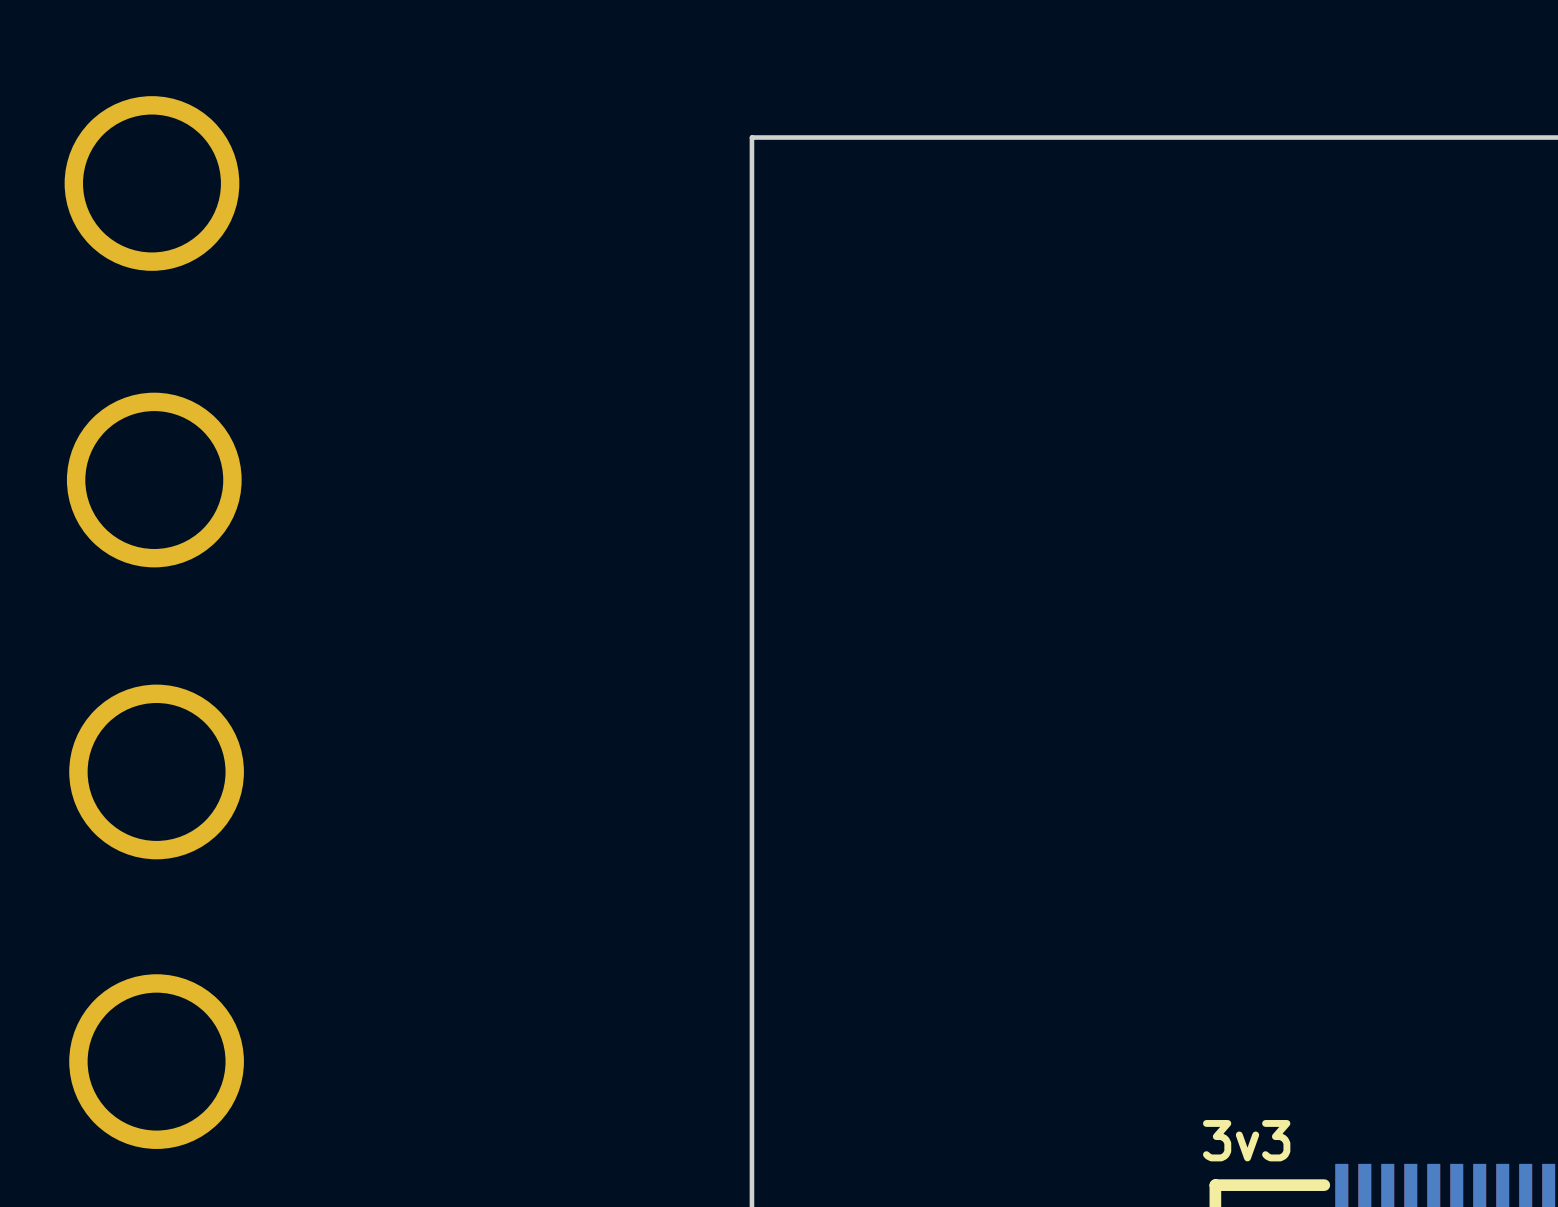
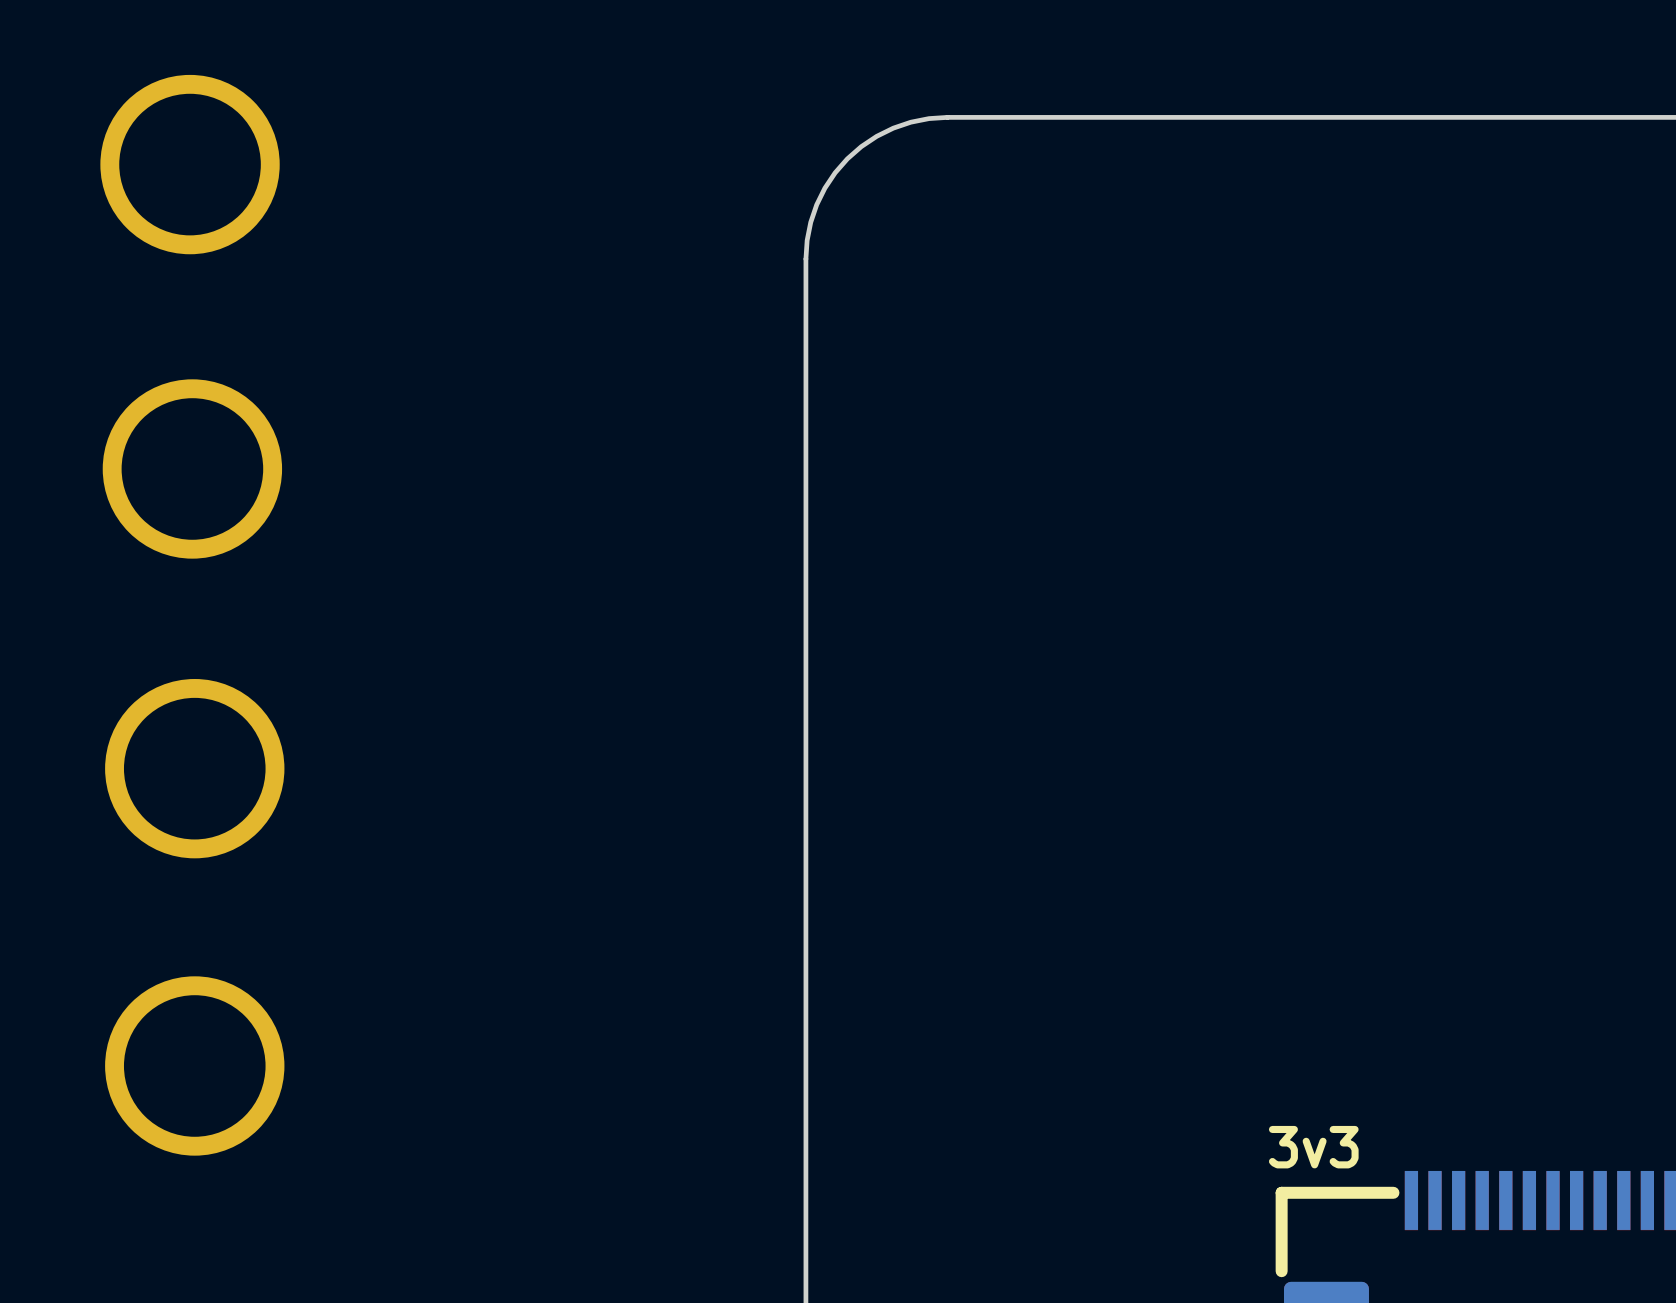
board edge: (889, 137) (751, 137) (751, 275) -> (947, 117) (929, 118) (893, 128) (876, 136) (847, 158) (835, 172) (816, 204) (810, 222) (805, 258)

